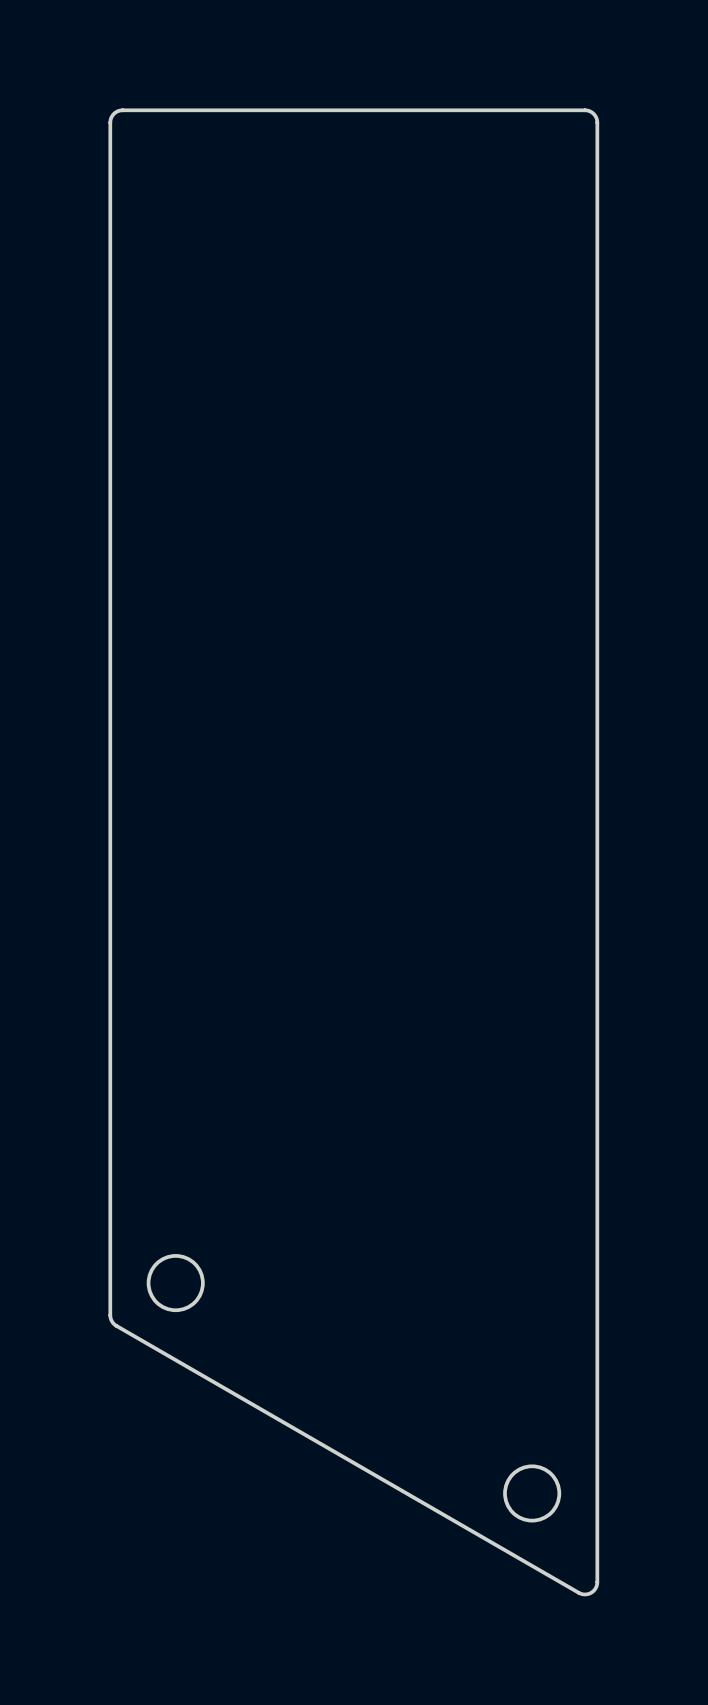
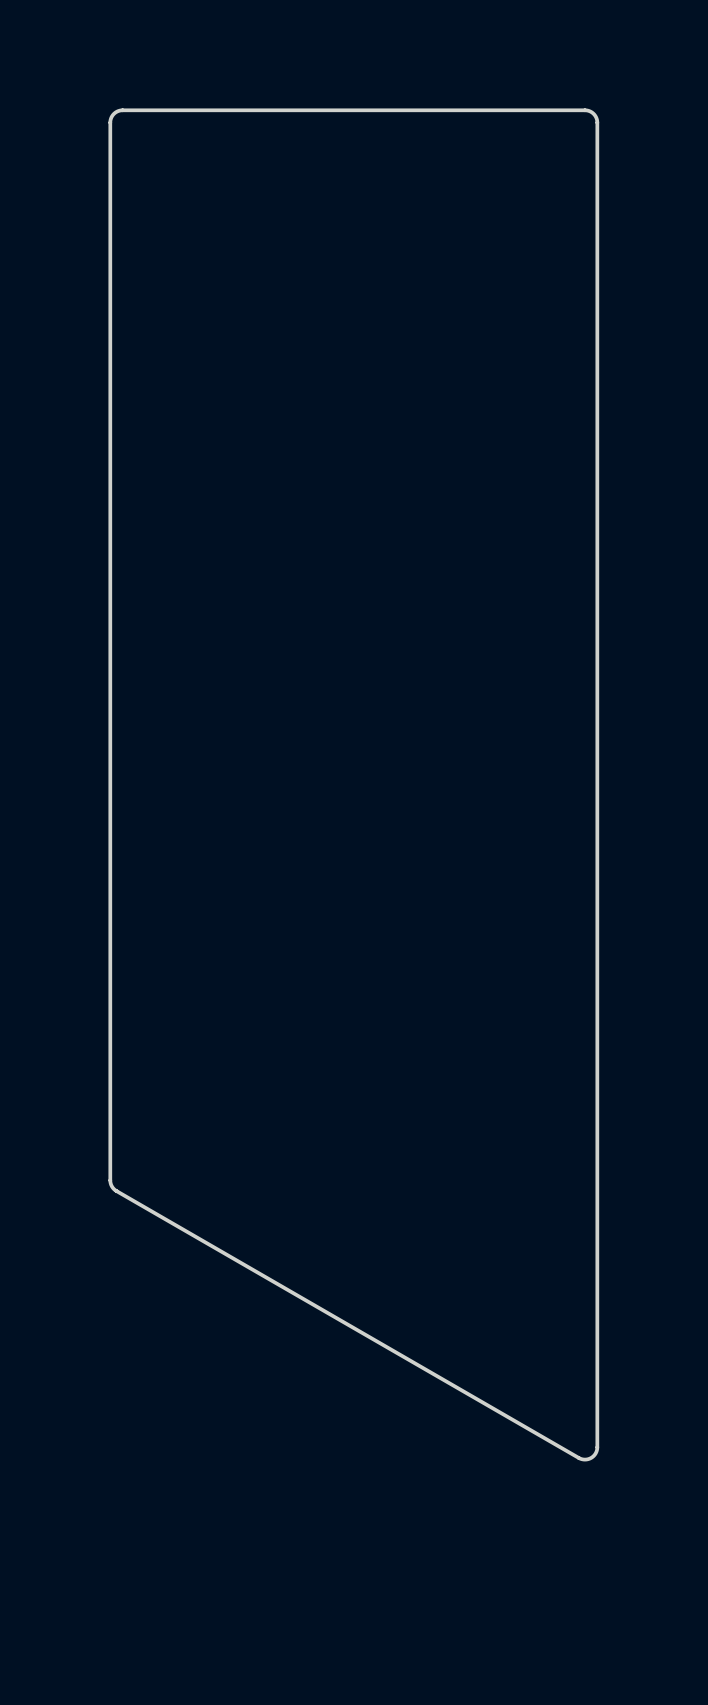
board edge: (110, 1180) (110, 1315) (115, 1325) (583, 1594) (592, 1591) (597, 1583) (597, 1447) -> (110, 1180) (111, 1186) (116, 1191) (578, 1457) (584, 1459) (591, 1457) (595, 1453) (597, 1447)
round board edge: [146, 1254, 205, 1313] -> none
round board edge: [503, 1464, 562, 1523] -> none

